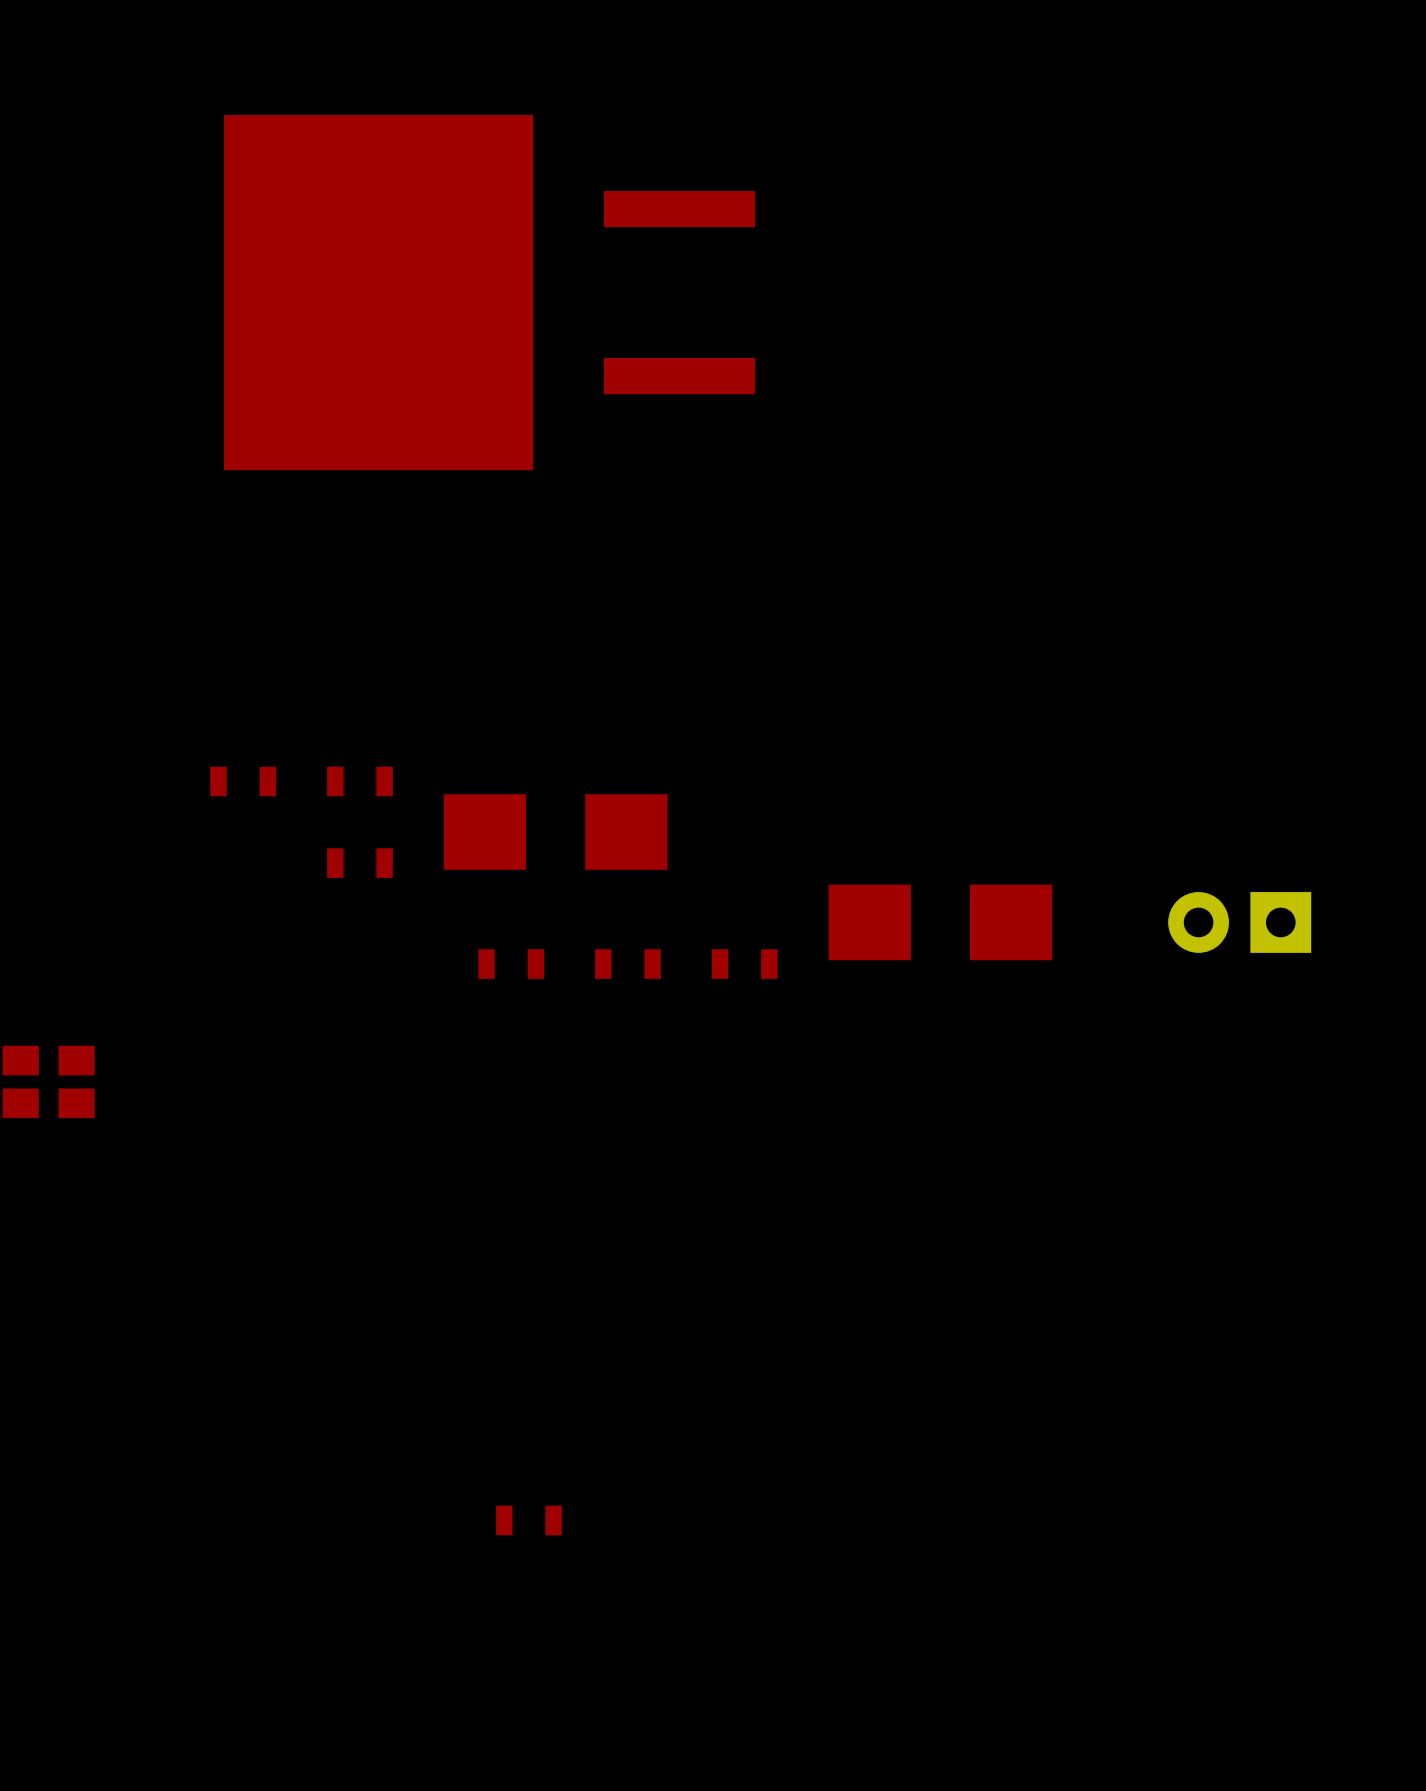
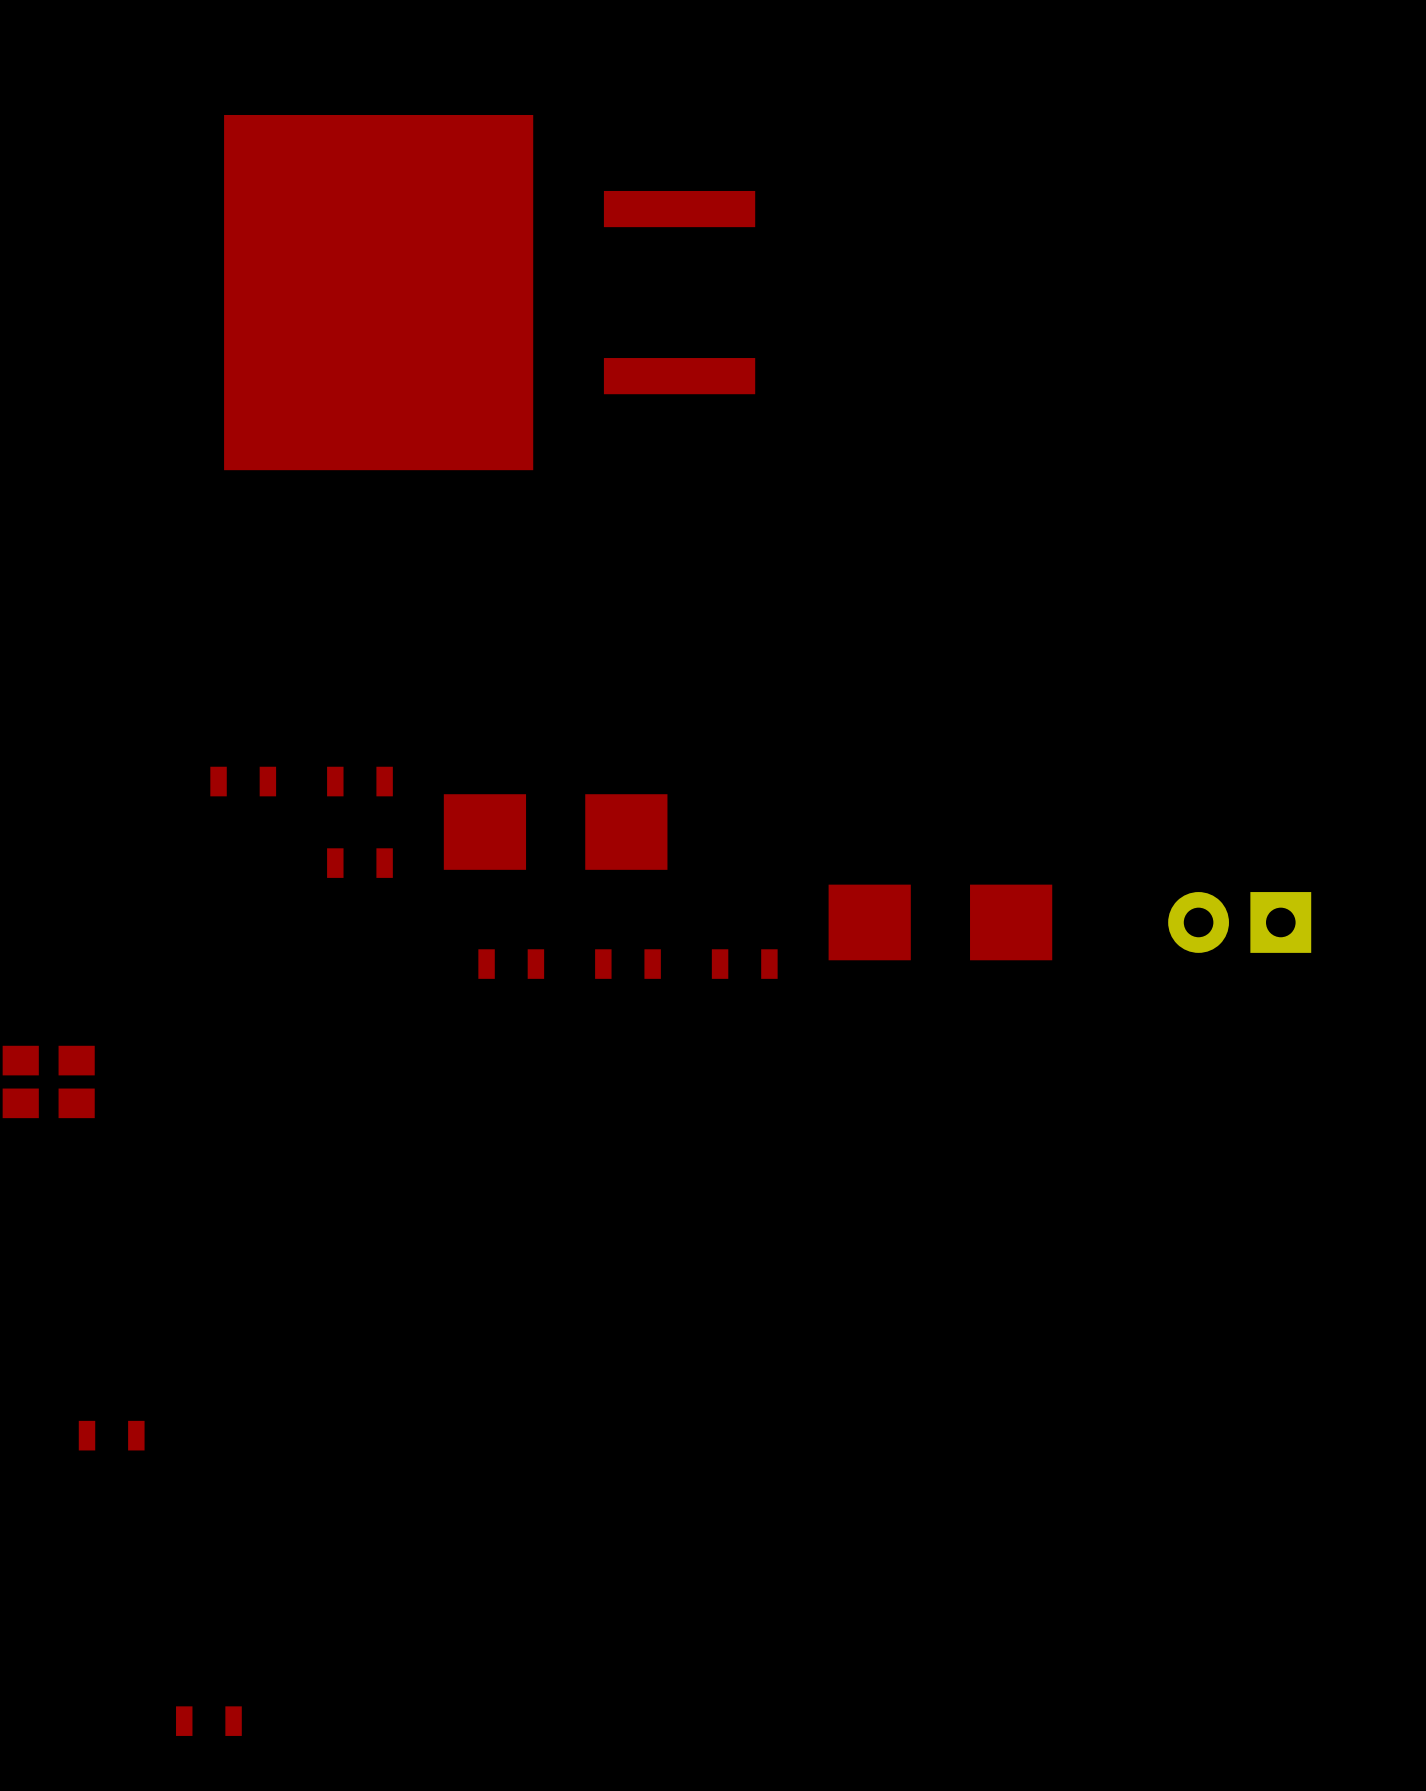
part: none -> (111, 1435)
part: (529, 1520) -> none
part: none -> (208, 1721)

